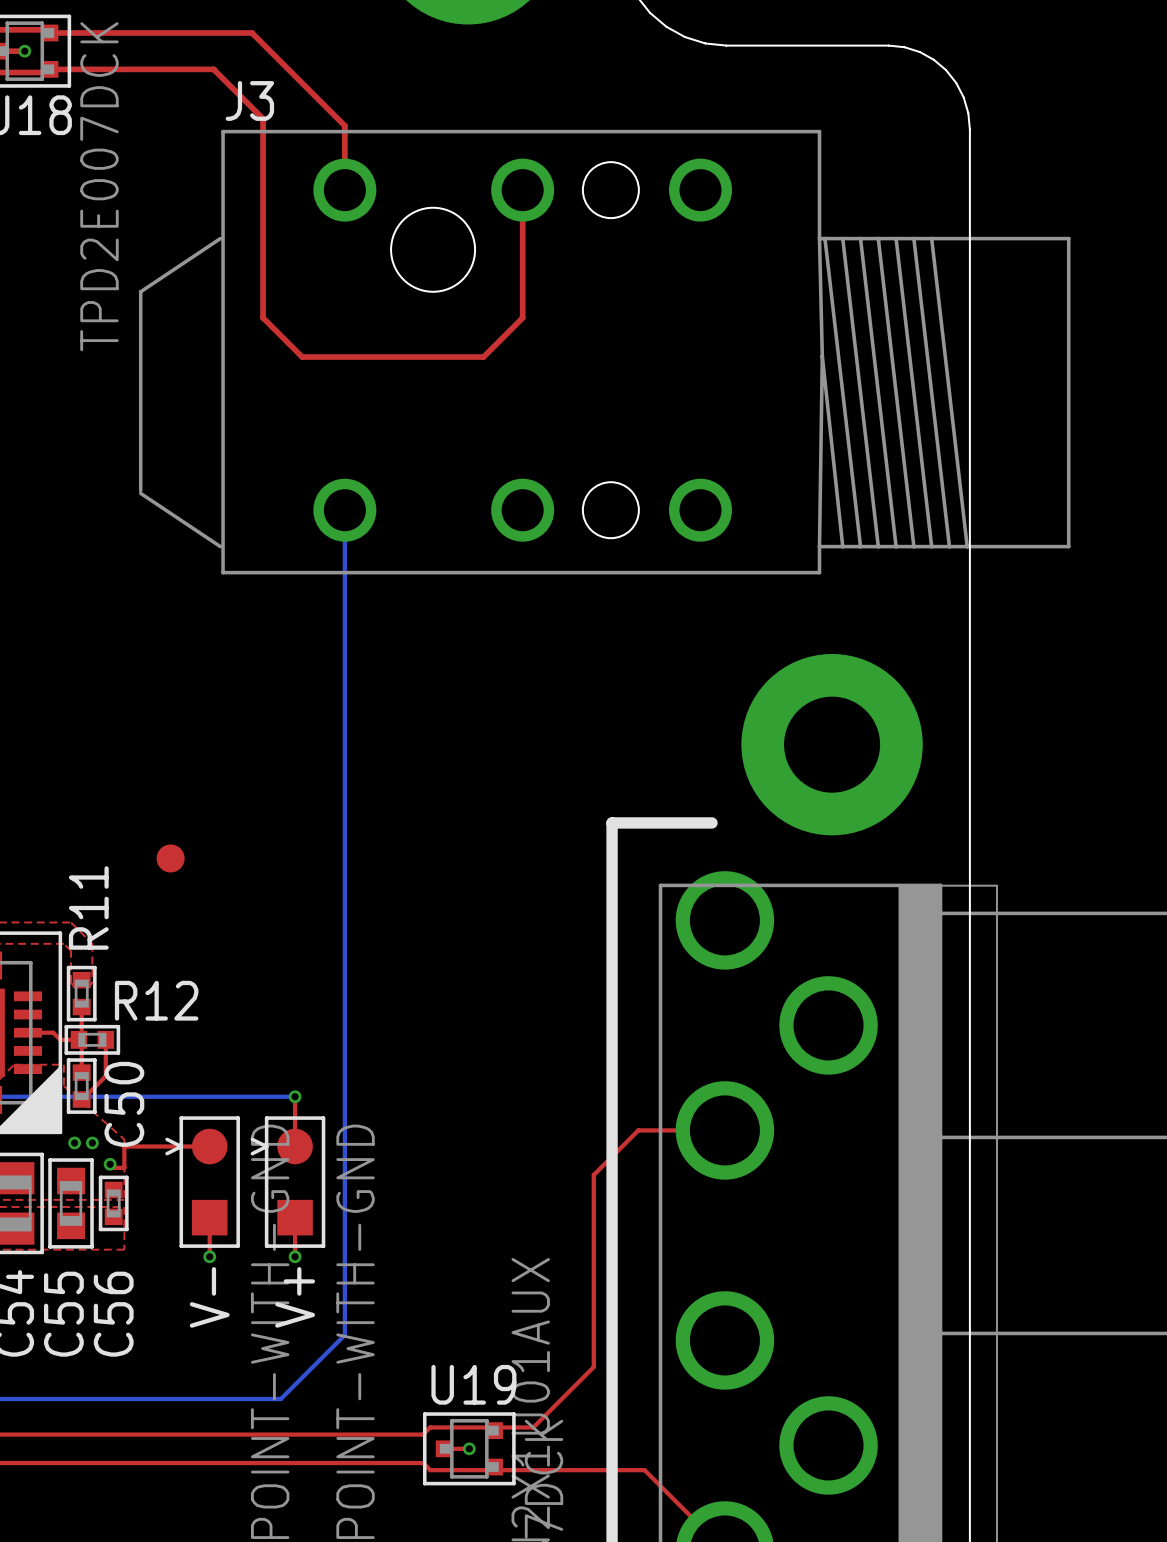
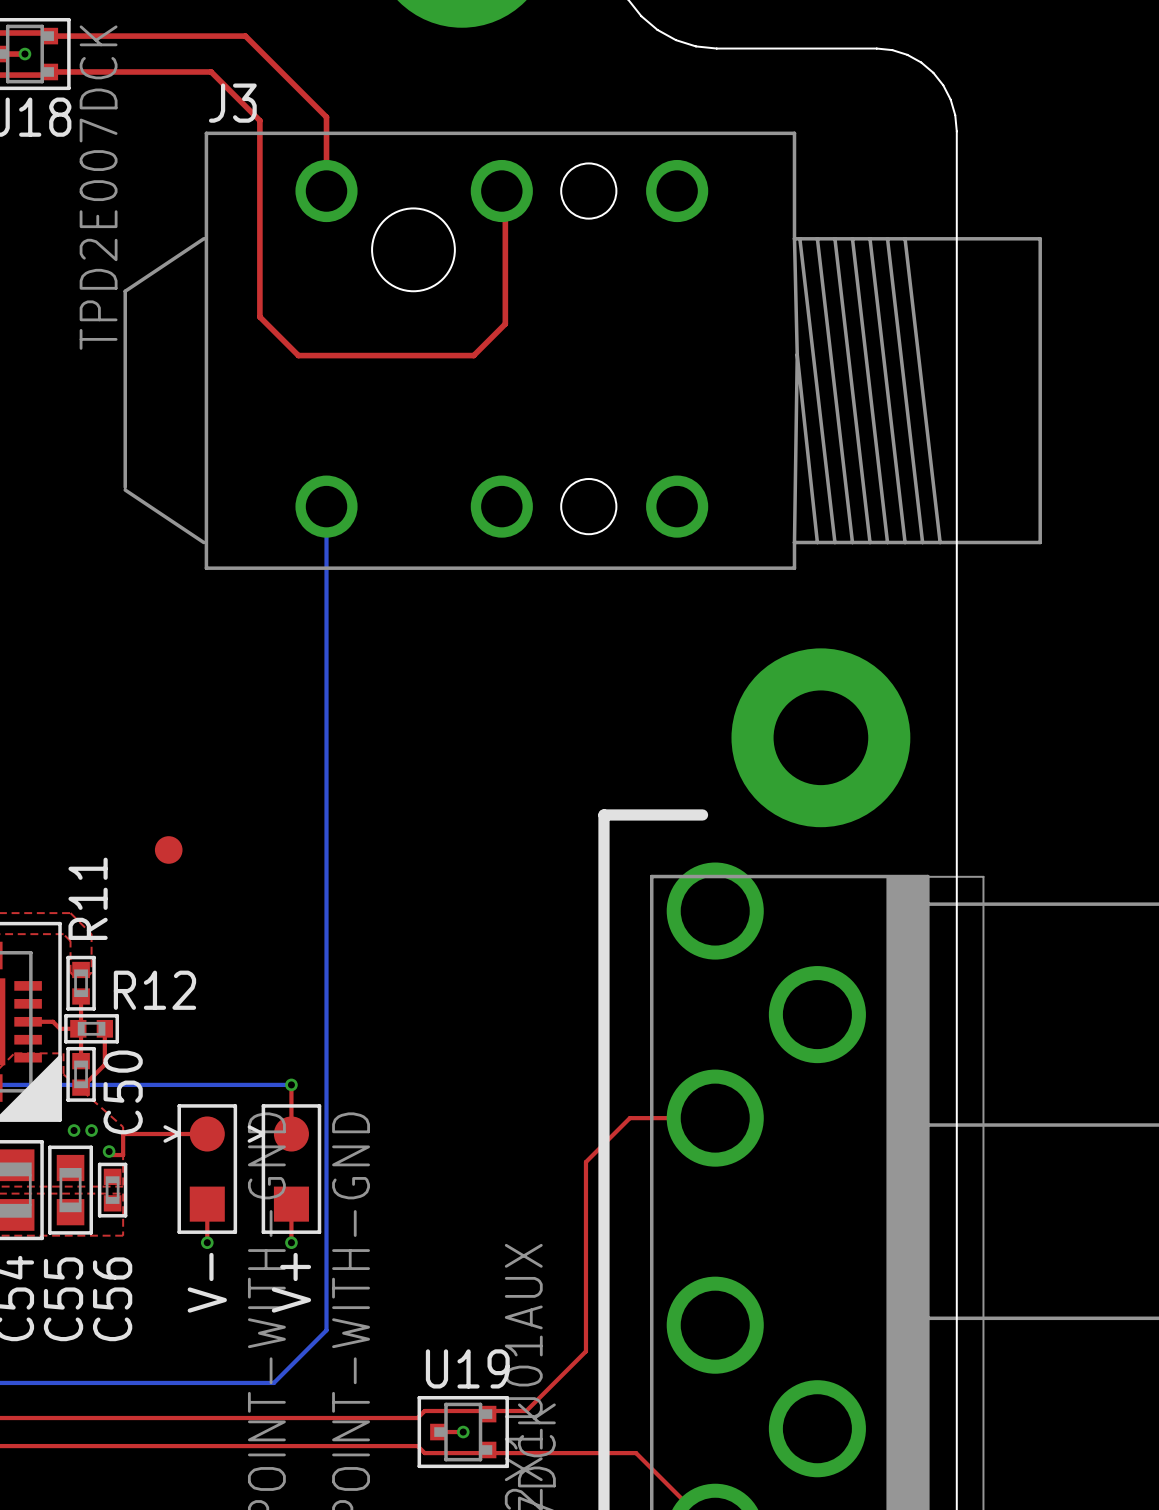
top track: (248, 32) (251, 32) (344, 125) (344, 190) -> (245, 36) (326, 117) (326, 191)
top track: (522, 190) (522, 317) (483, 357) (480, 357) -> (501, 191) (505, 194) (505, 324) (473, 355)
J3 position: (604, 352) -> (582, 350)
bottom track: (344, 510) (344, 1335) (280, 1399) (277, 1399) -> (326, 506) (326, 1330) (273, 1382)

